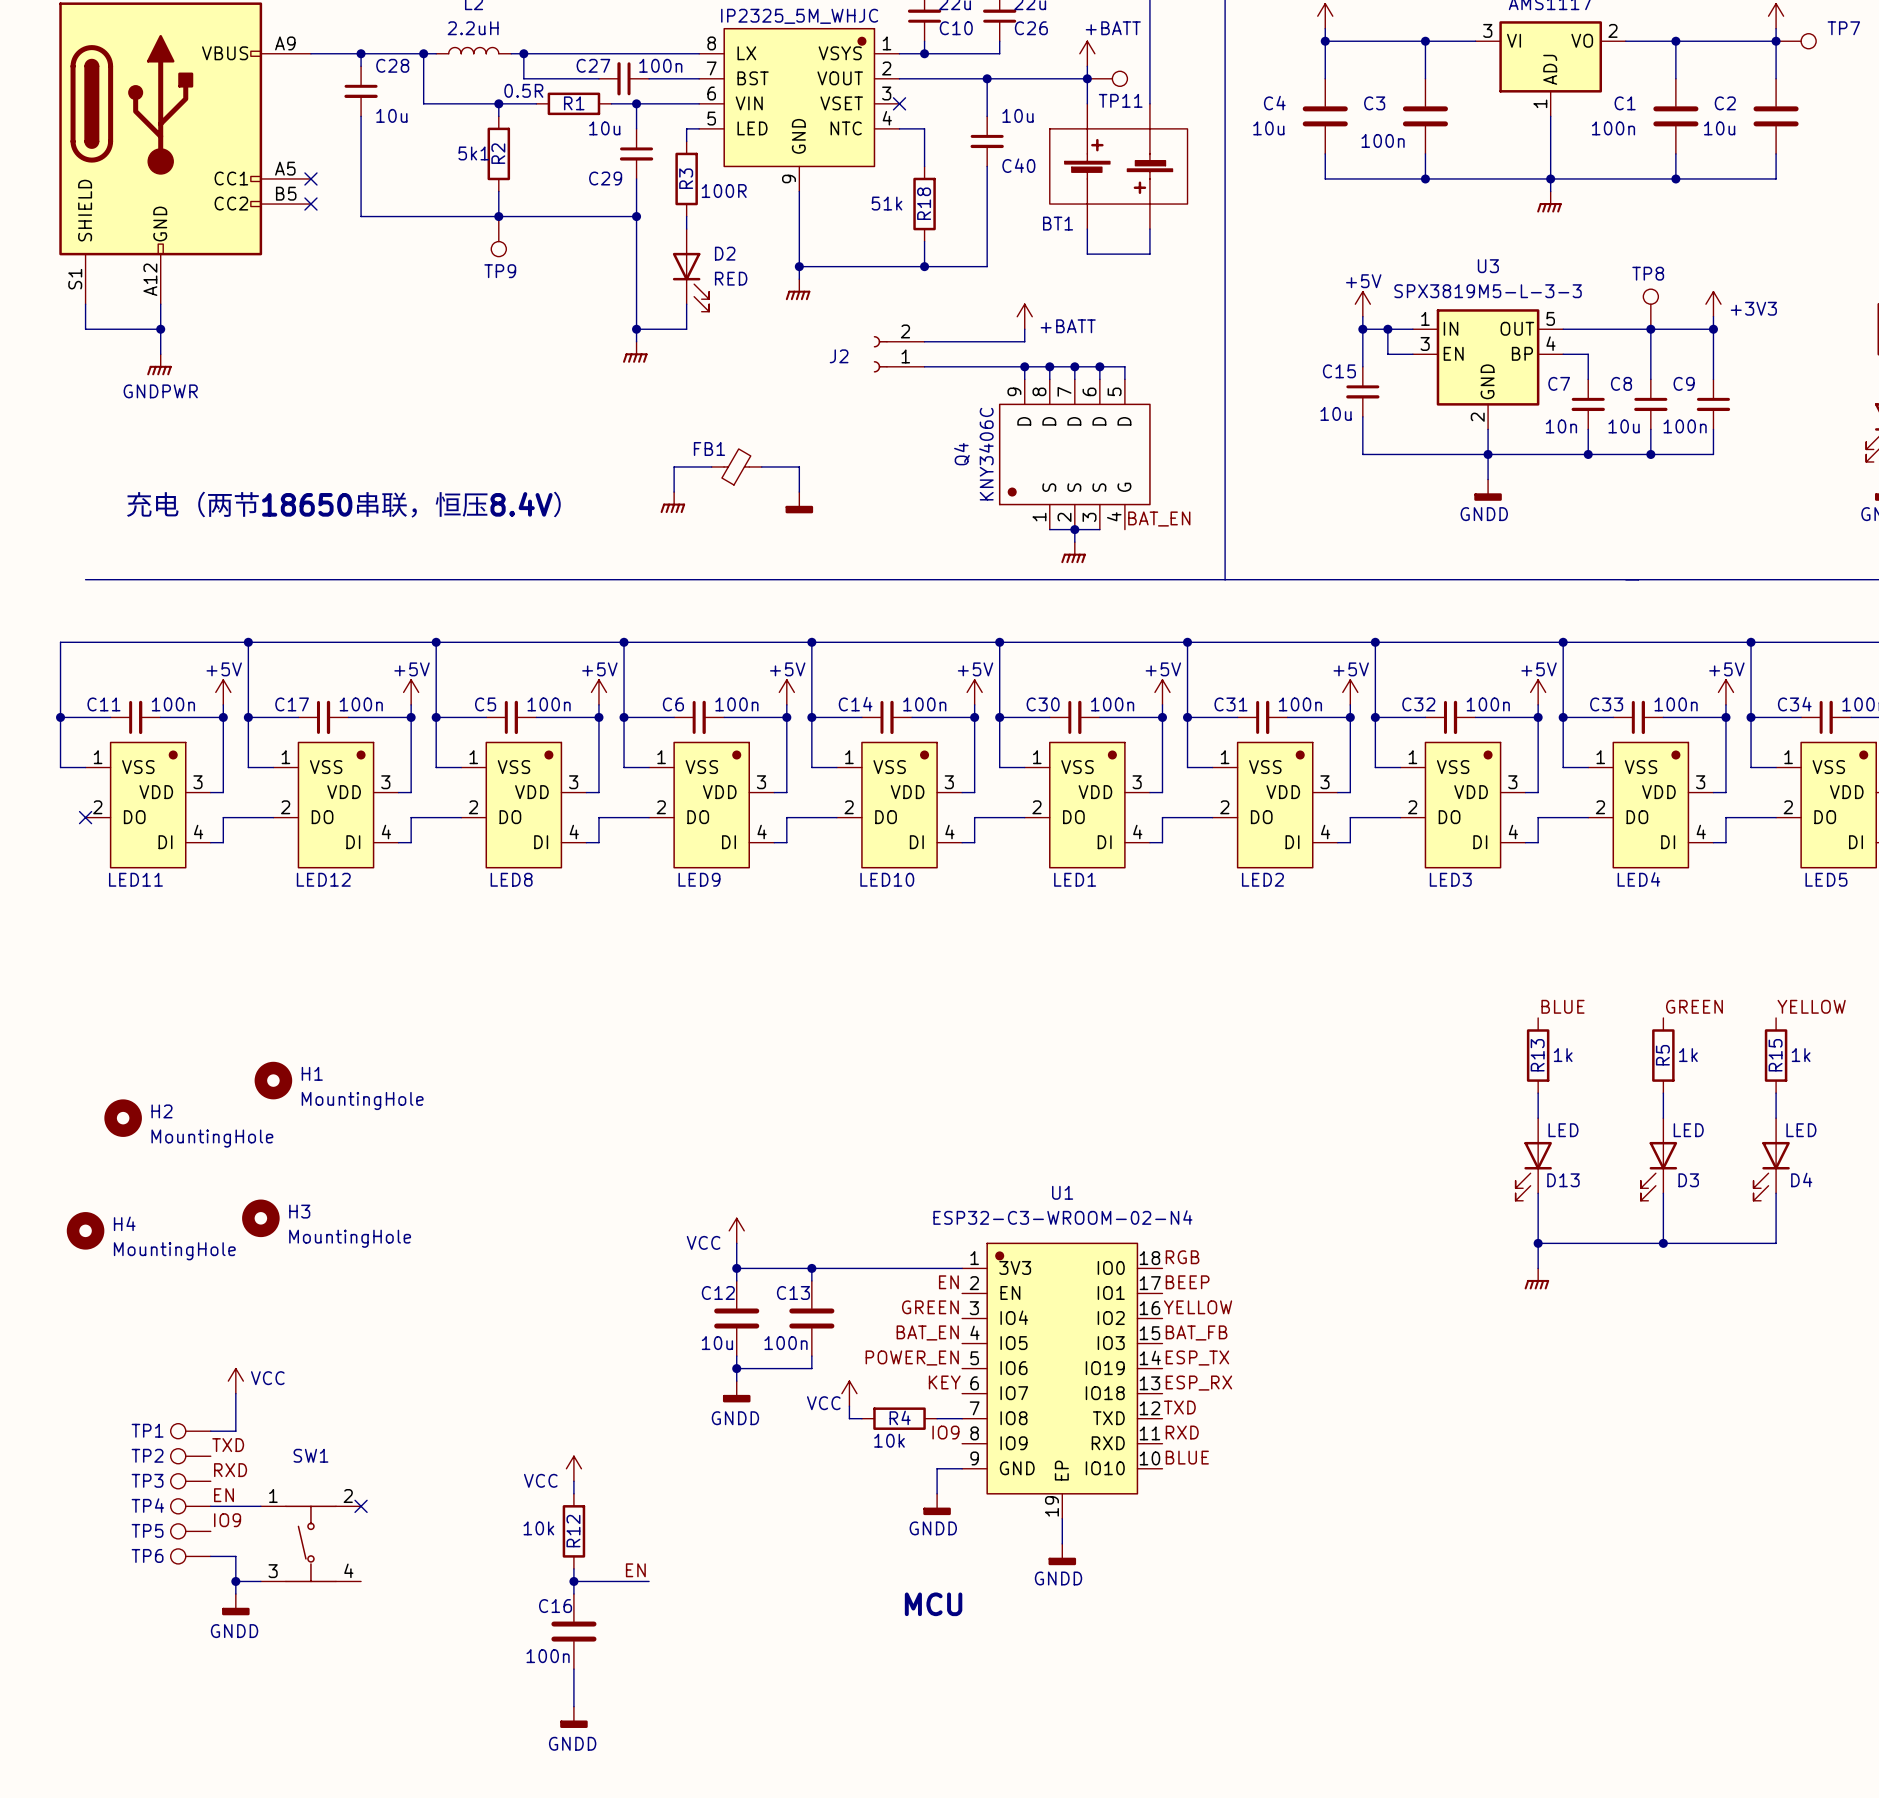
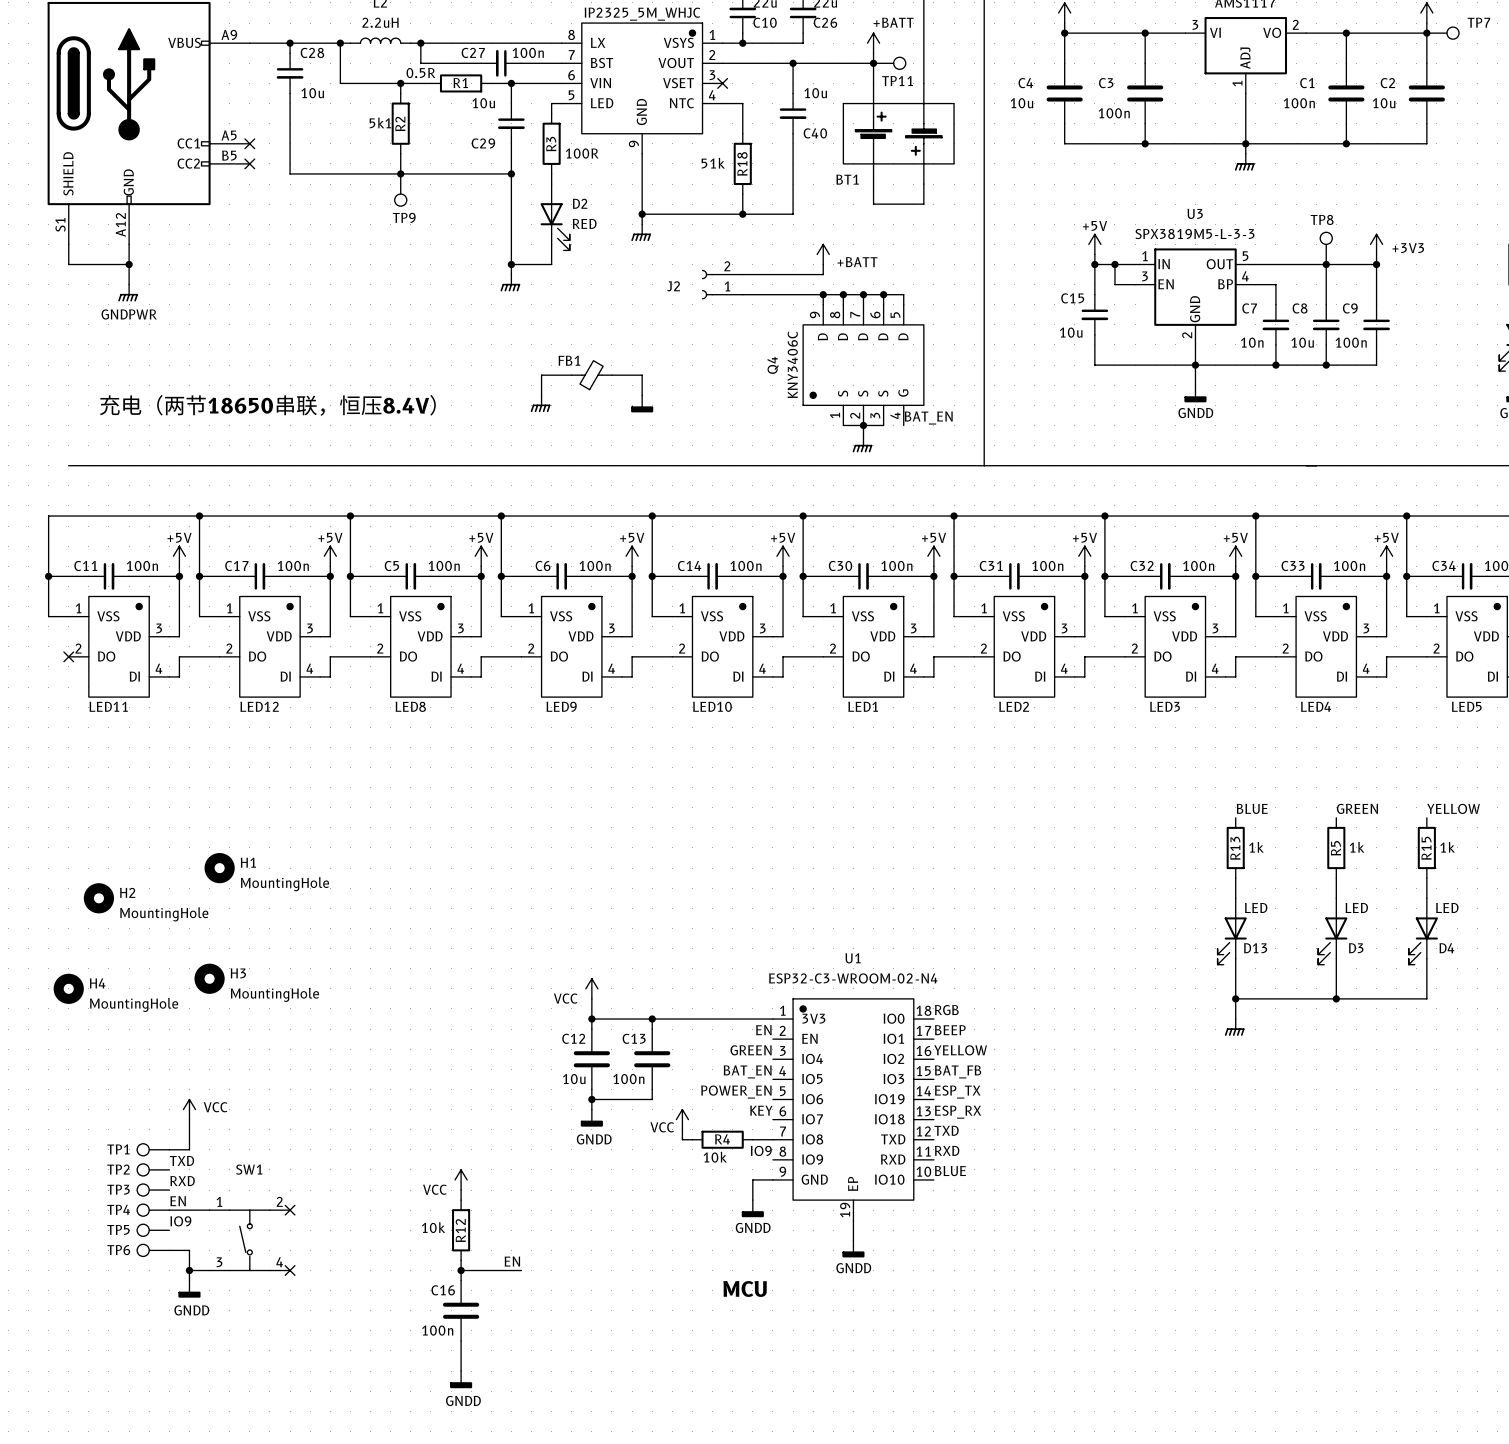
no-connect mark: none -> (290, 1270)

